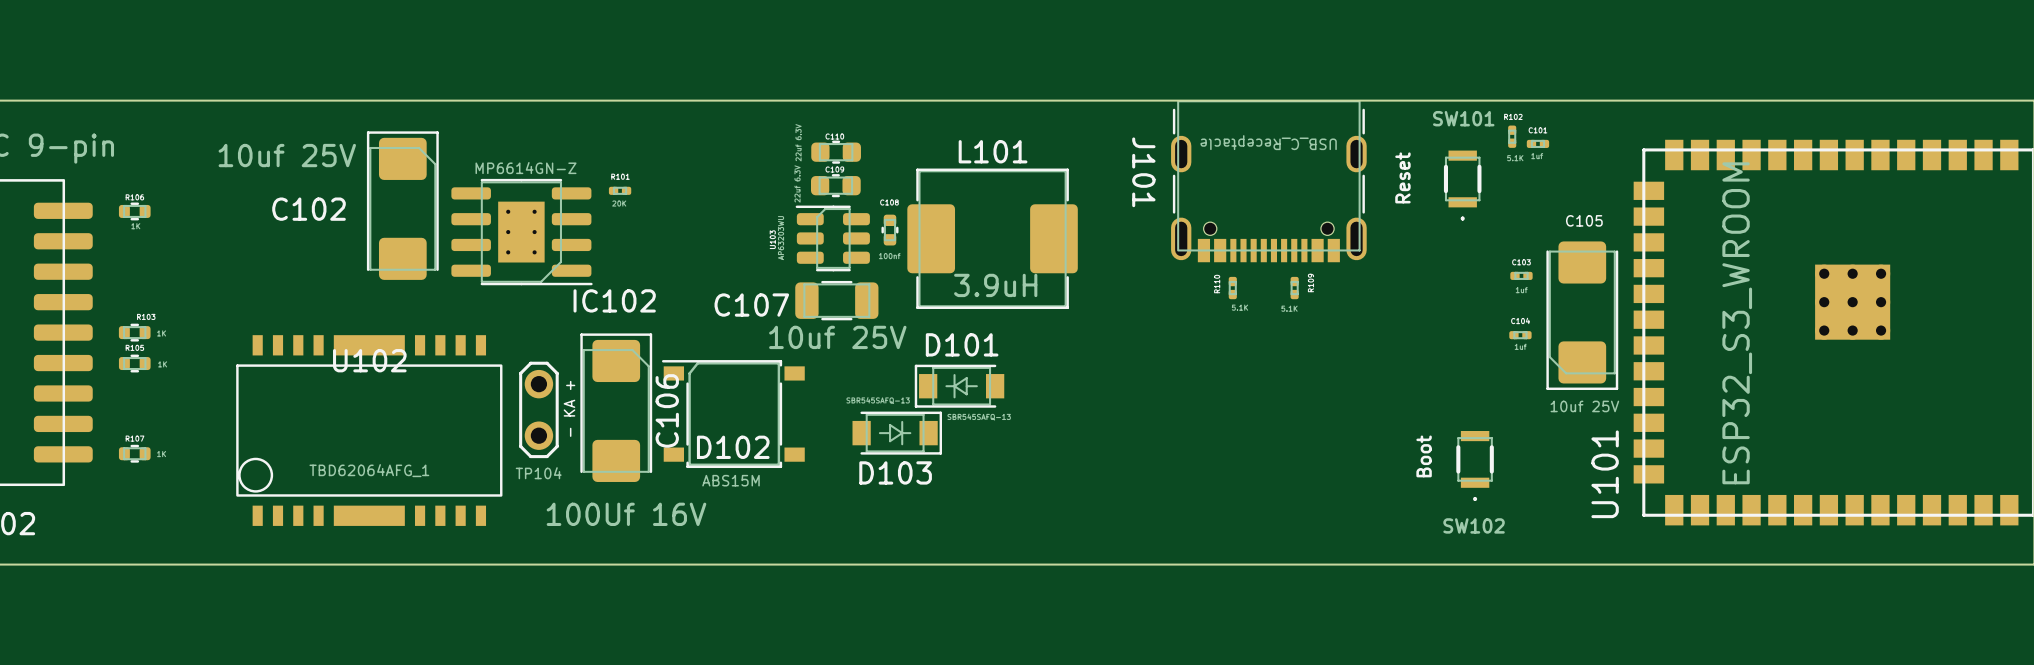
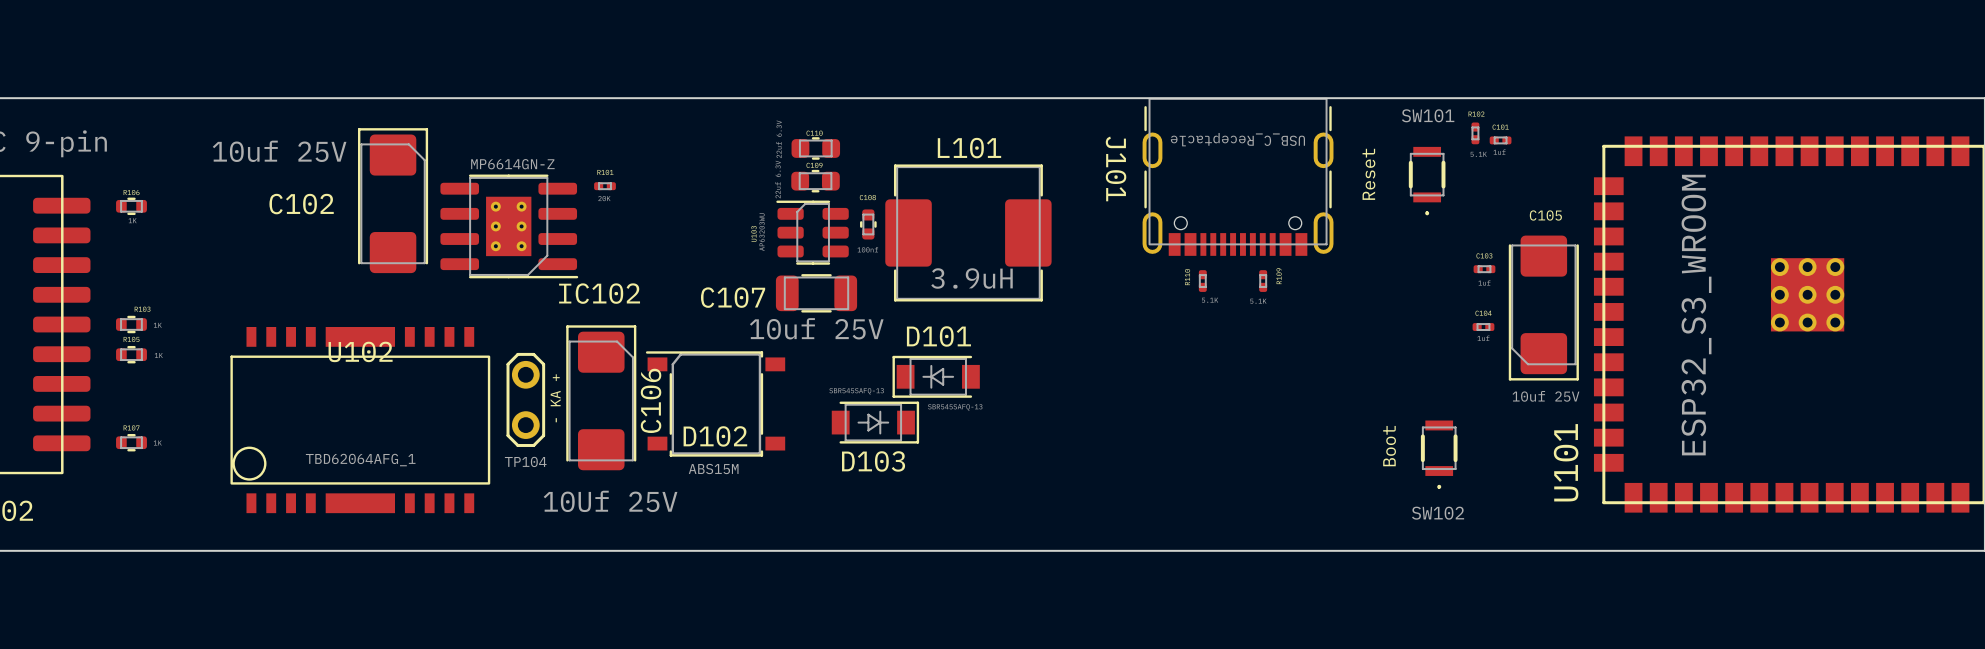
C106 value: 100Uf 16V (626, 514) -> 10Uf 25V (610, 501)

